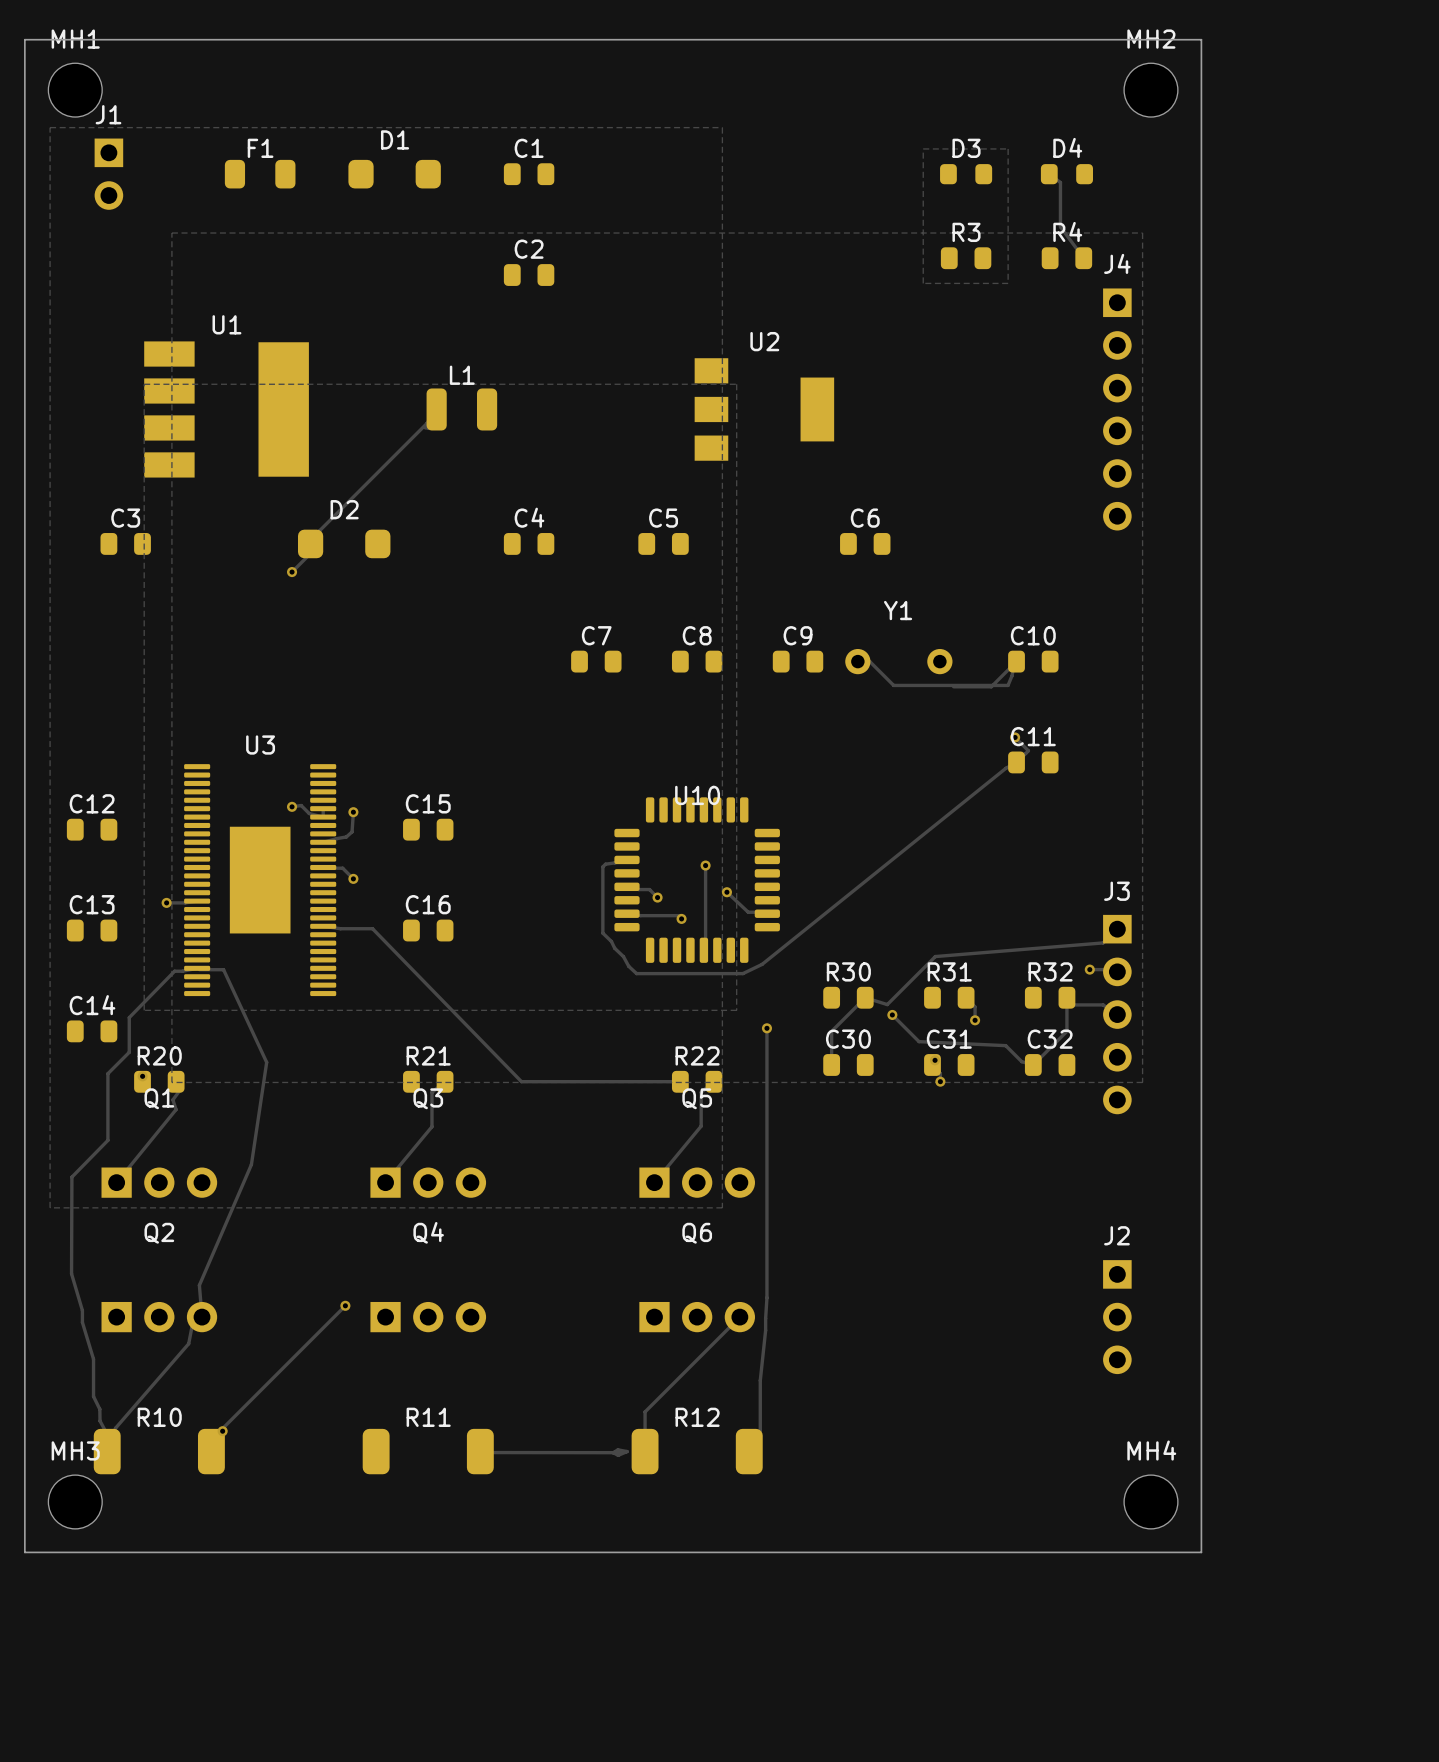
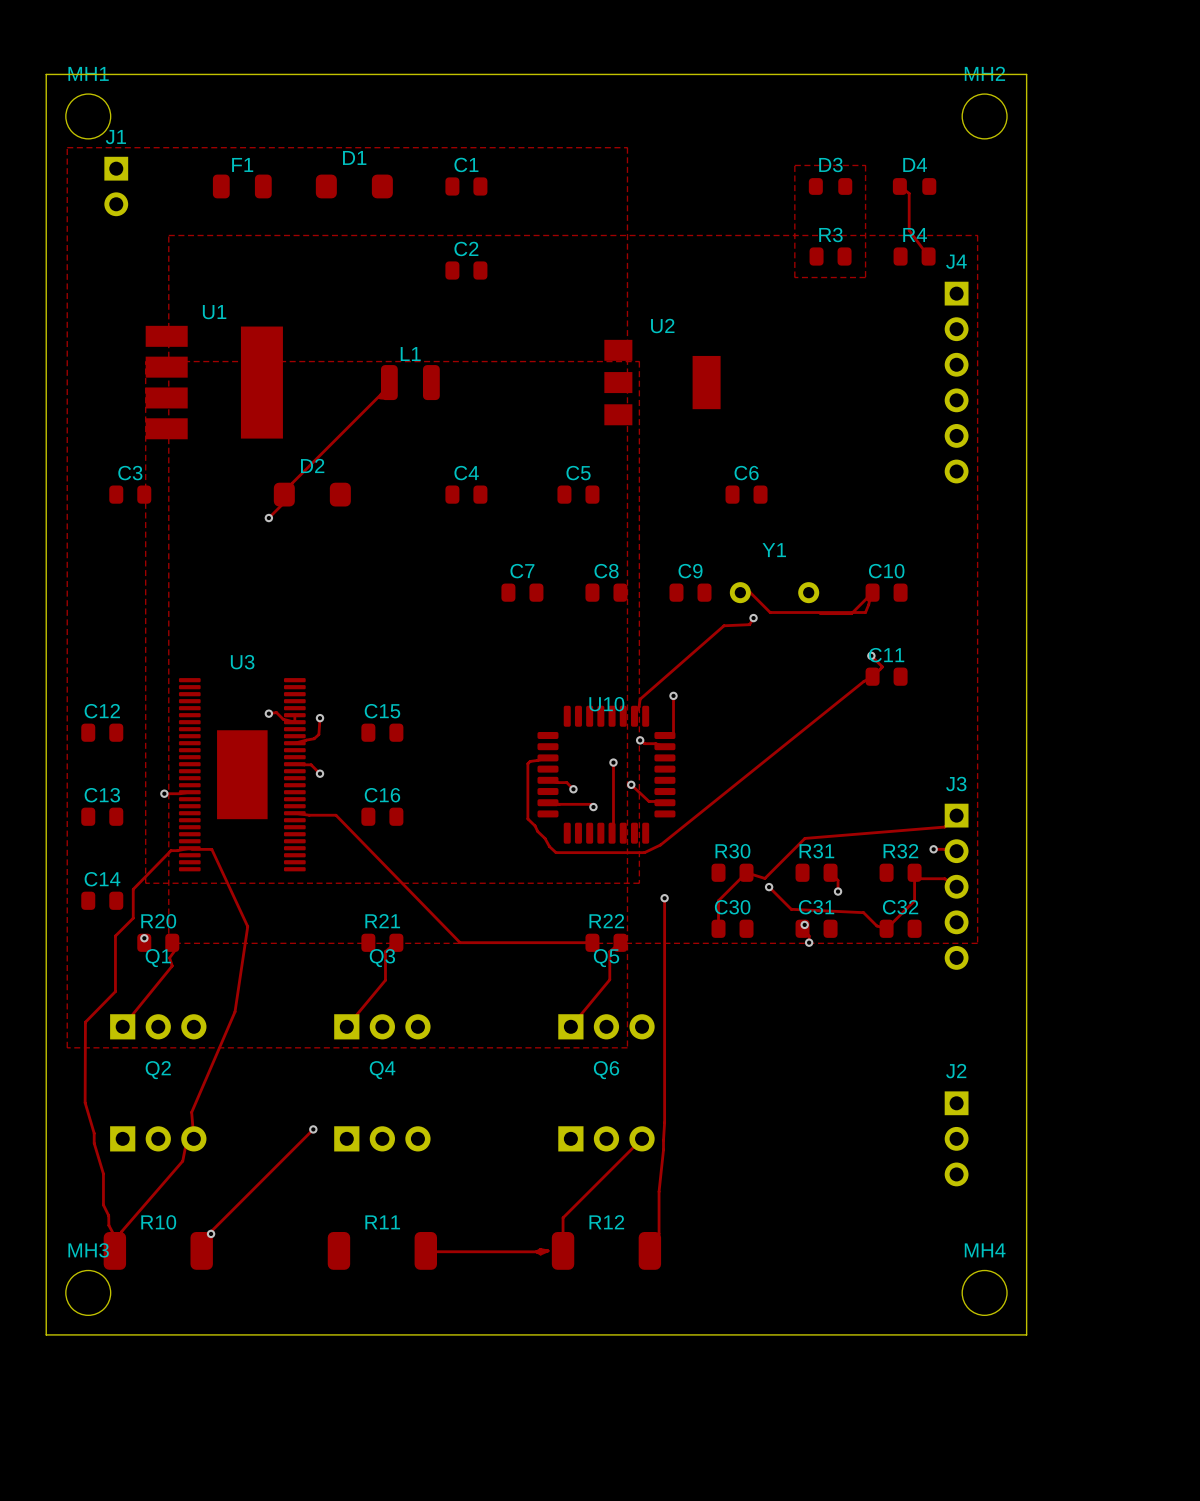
track: none -> (753, 618) (749, 624) (724, 625) (640, 699) (634, 716)
via: none -> (753, 618)
track: none -> (673, 695) (673, 733) (664, 735)
via: none -> (673, 695)
track: none -> (640, 740) (644, 743) (655, 743) (664, 746)
via: none -> (640, 740)

